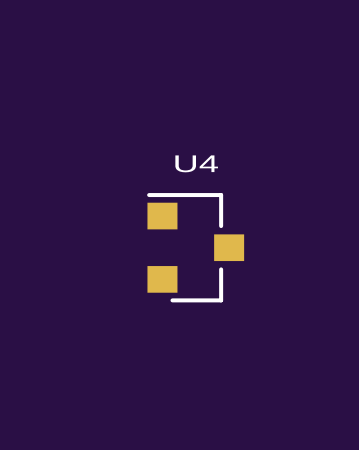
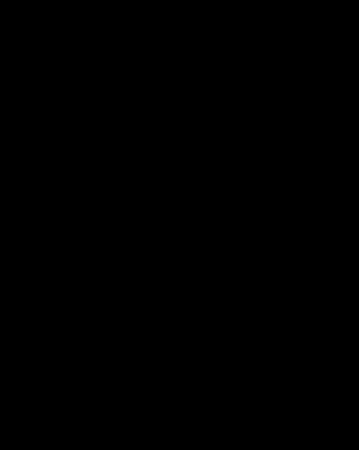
U4: (195, 247) -> none

